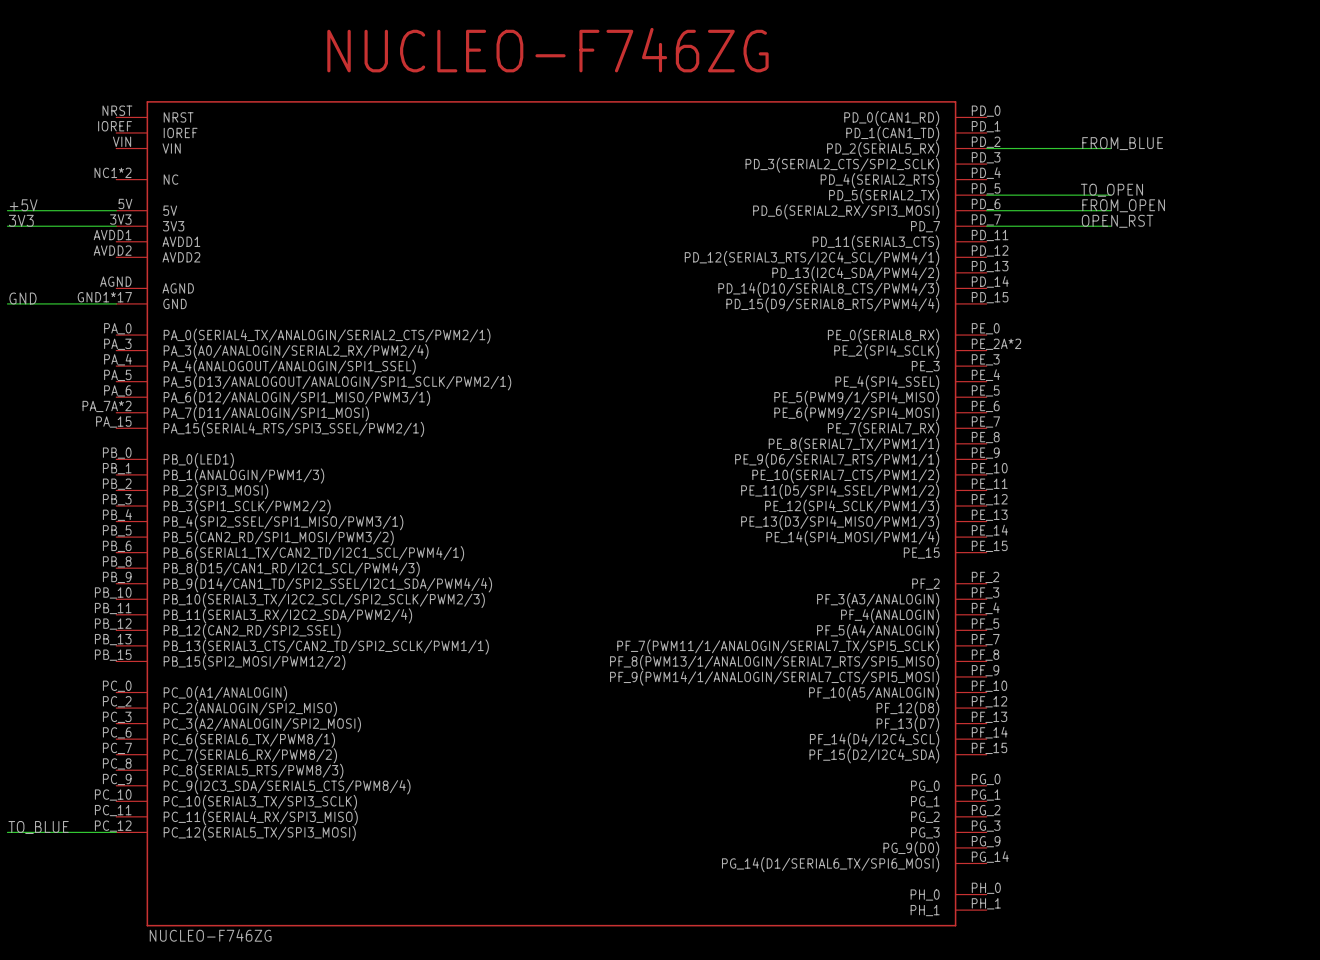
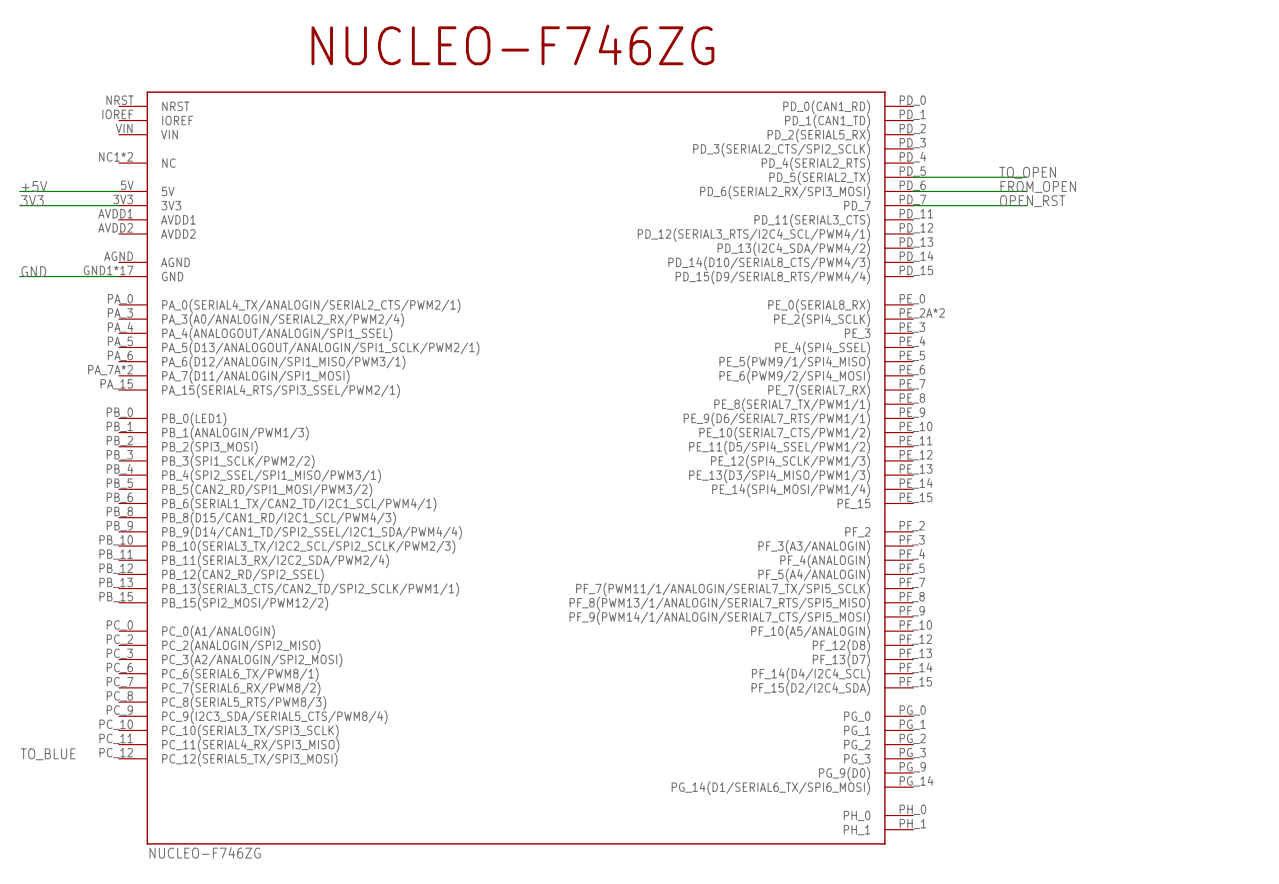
label: FROM_BLUE (1122, 143) -> none
wire: (986, 148) (1111, 148) -> none
wire: (7, 832) (116, 832) -> none

